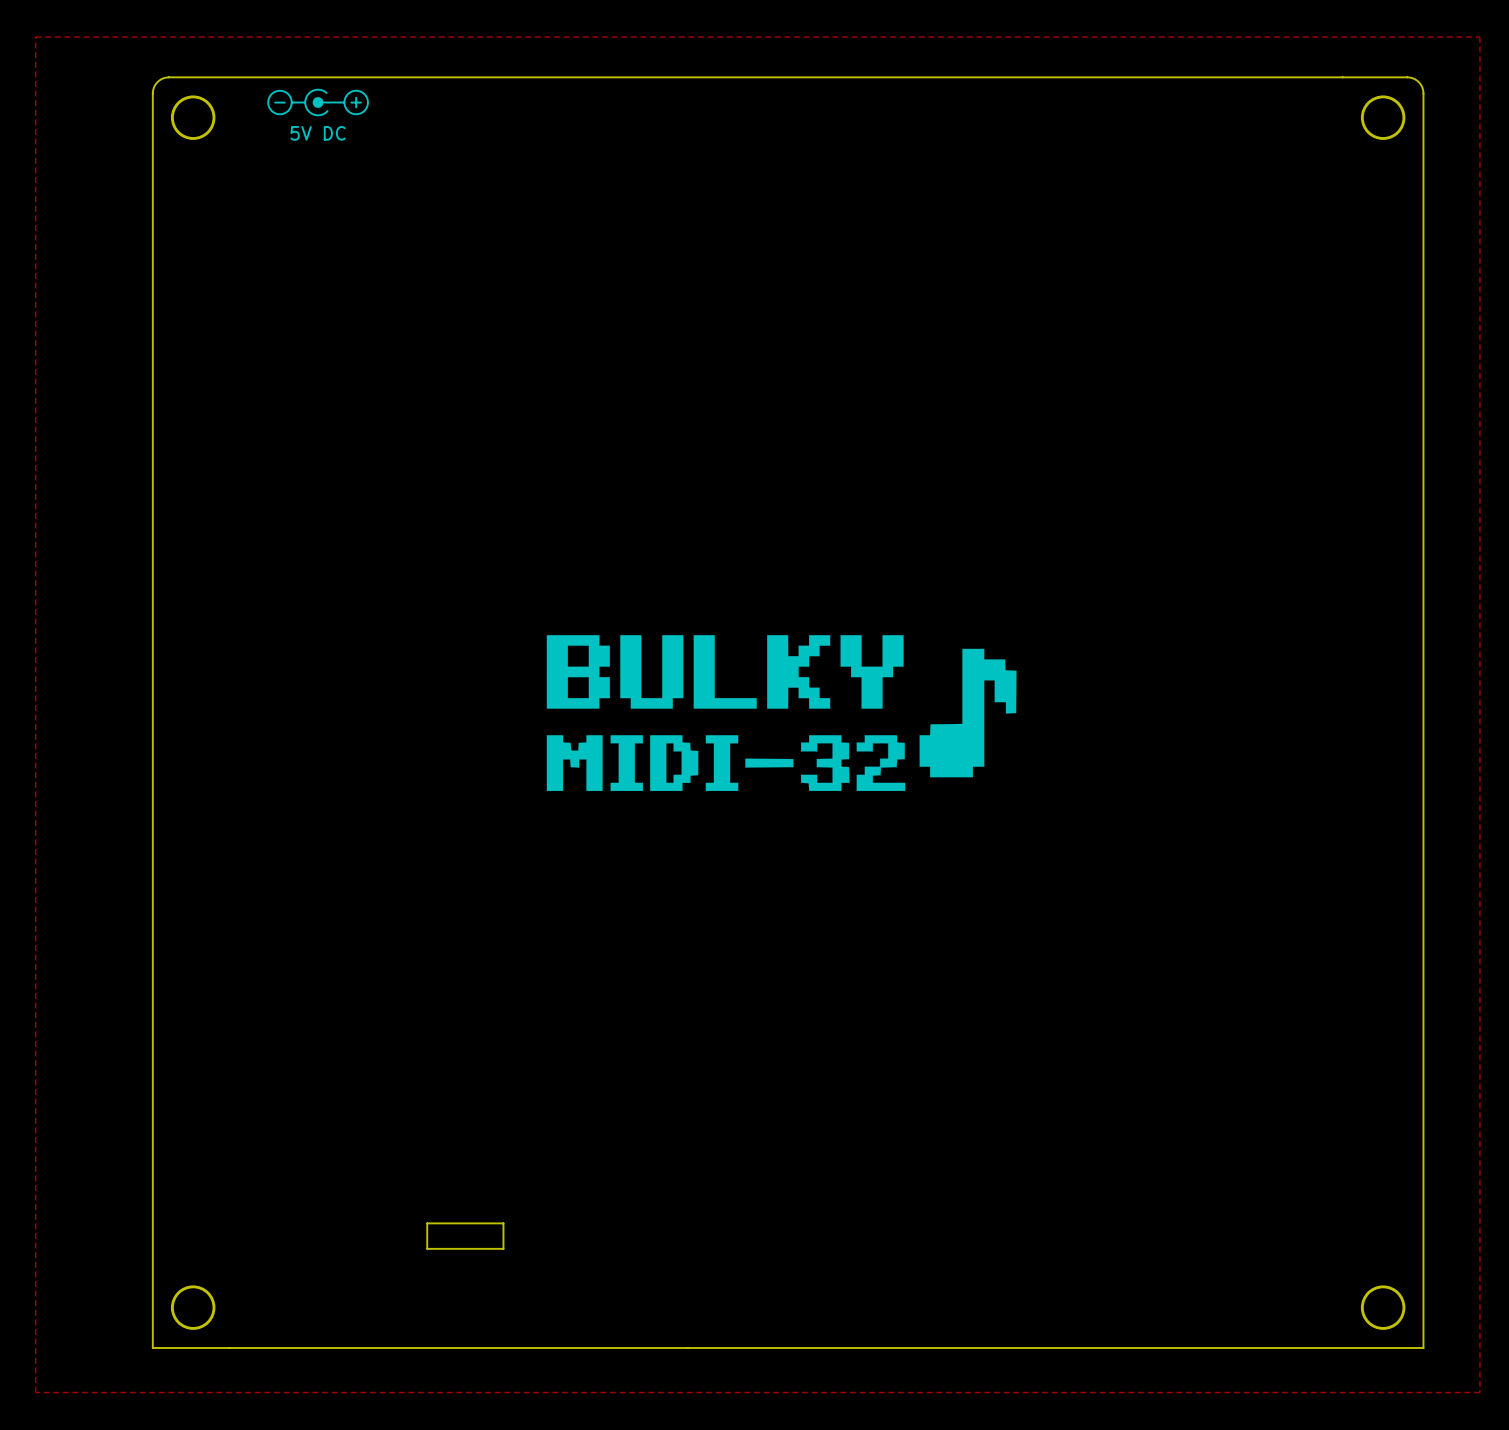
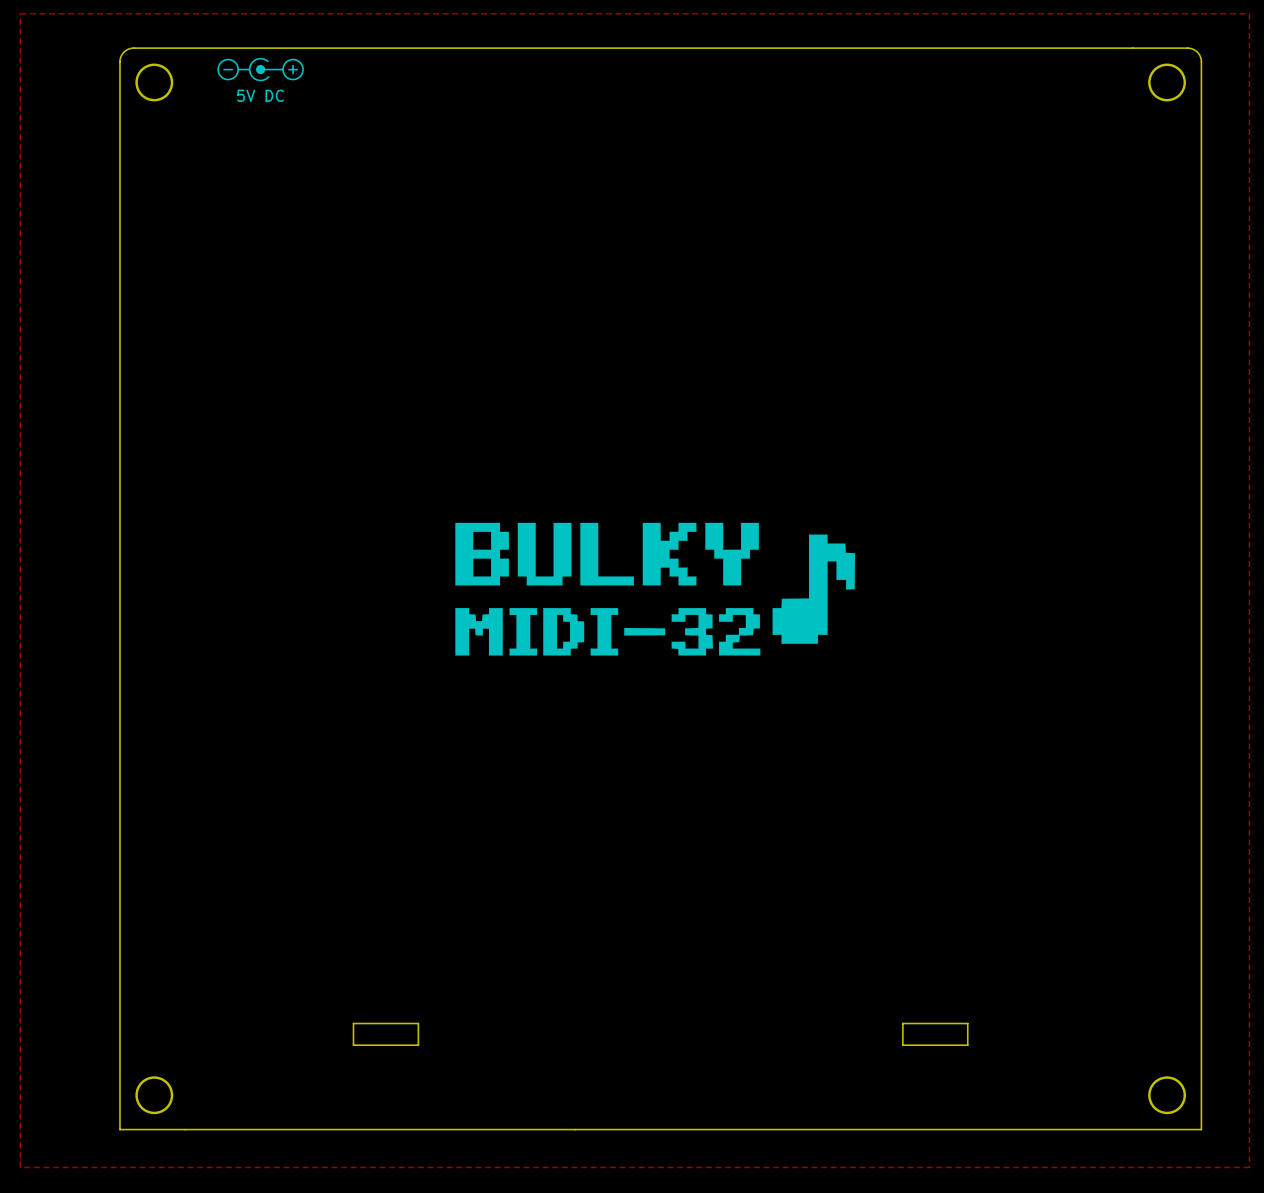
board edge: none -> (902, 1023) (967, 1023) (967, 1045) (902, 1045) (902, 1023)

